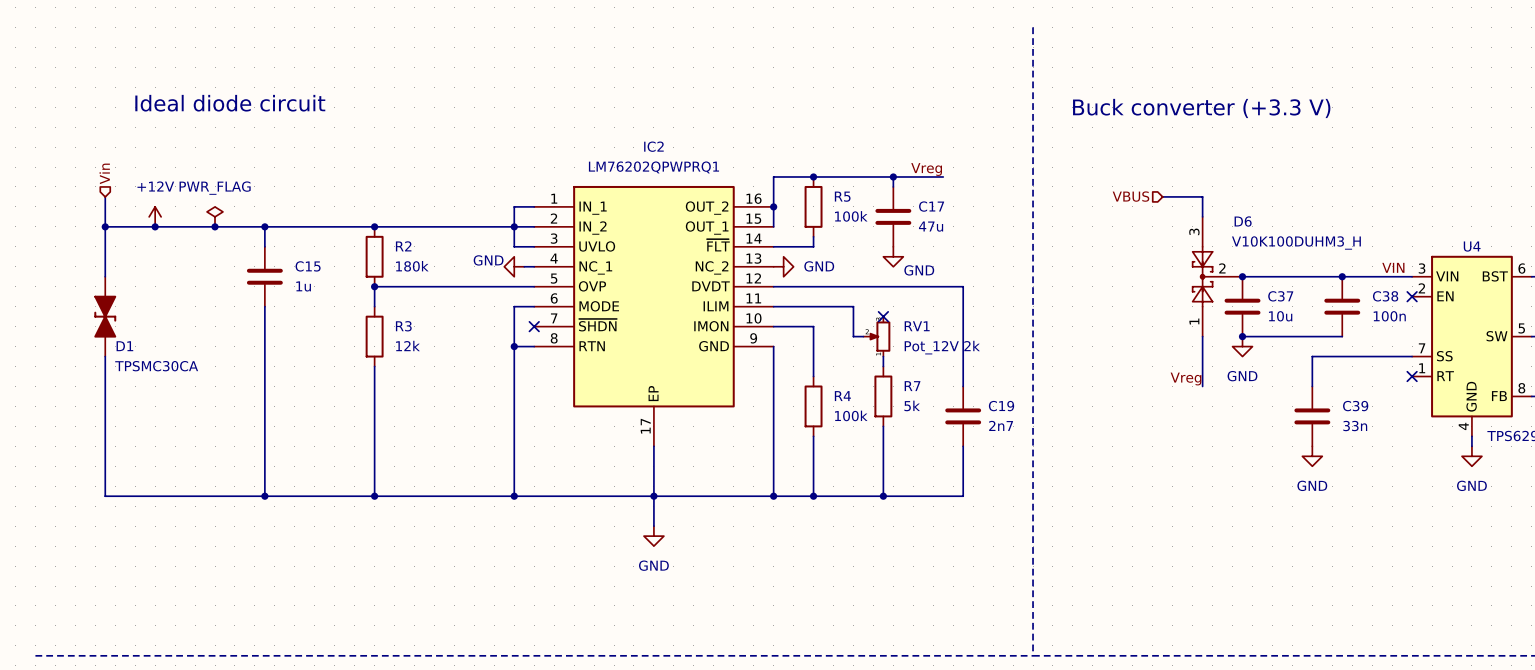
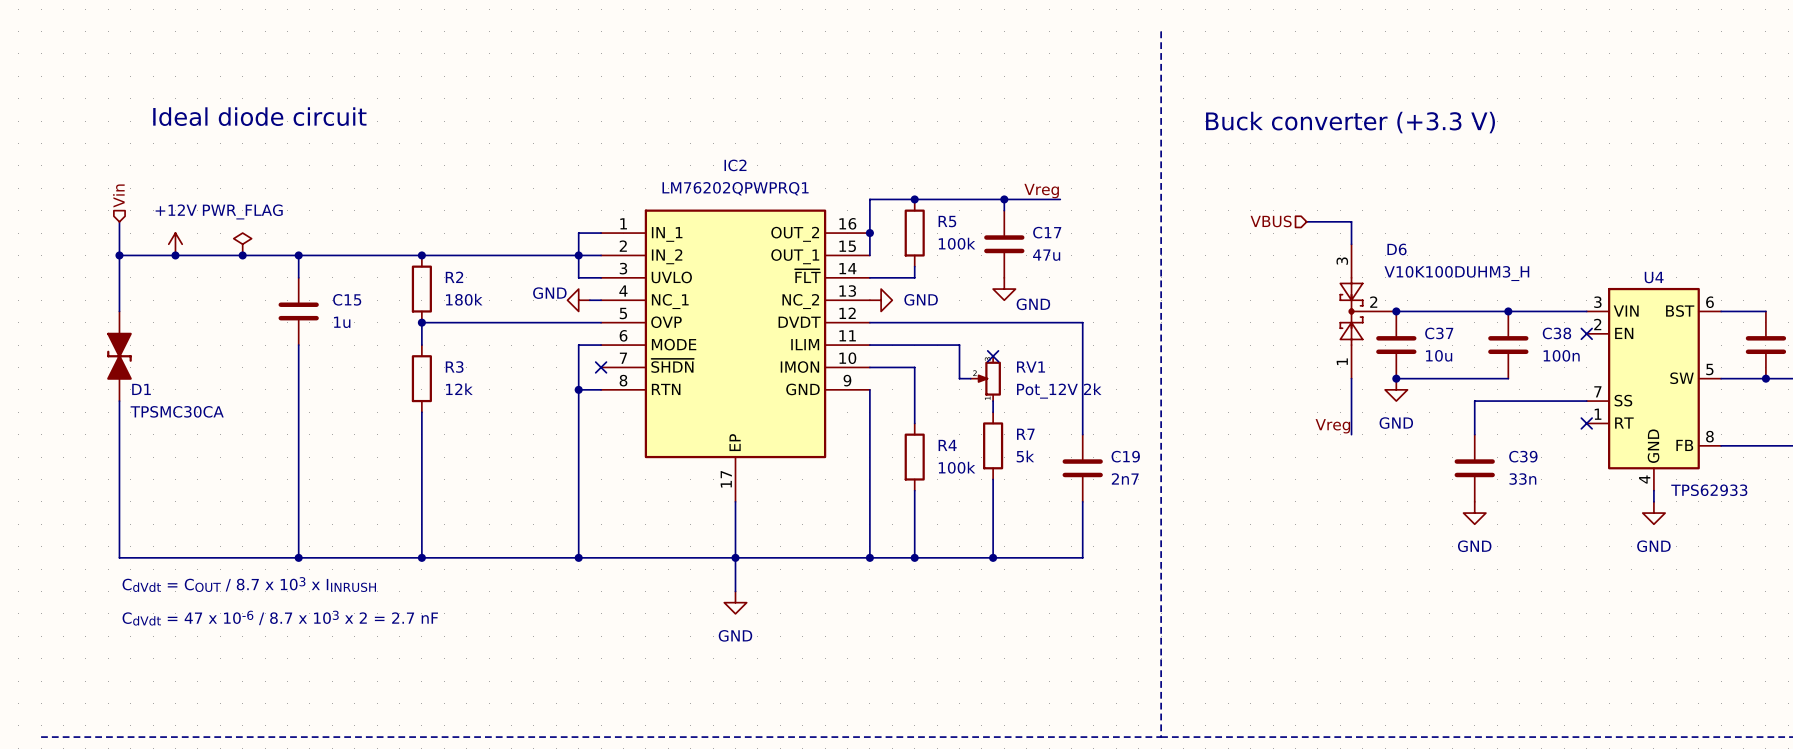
label: VIN (1393, 267) -> none
text: none -> CdVdt = COUT / 8.7 x 103 x IINRUSH (249, 584)
text: none -> CdVdt = 47 x 10-6 / 8.7 x 103 x 2 = 2.7 nF (280, 618)

